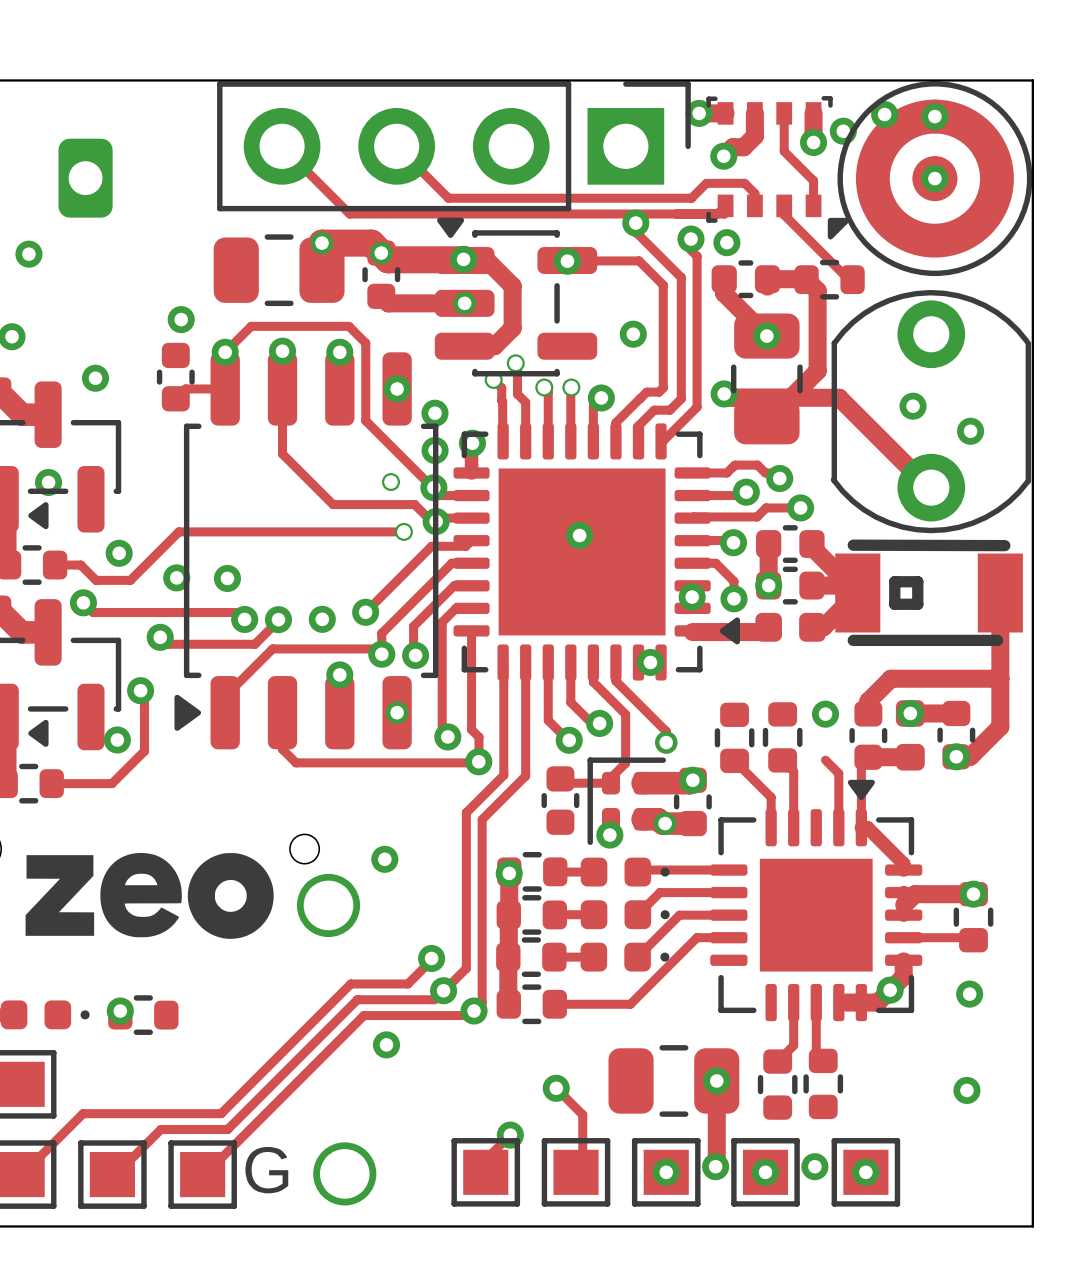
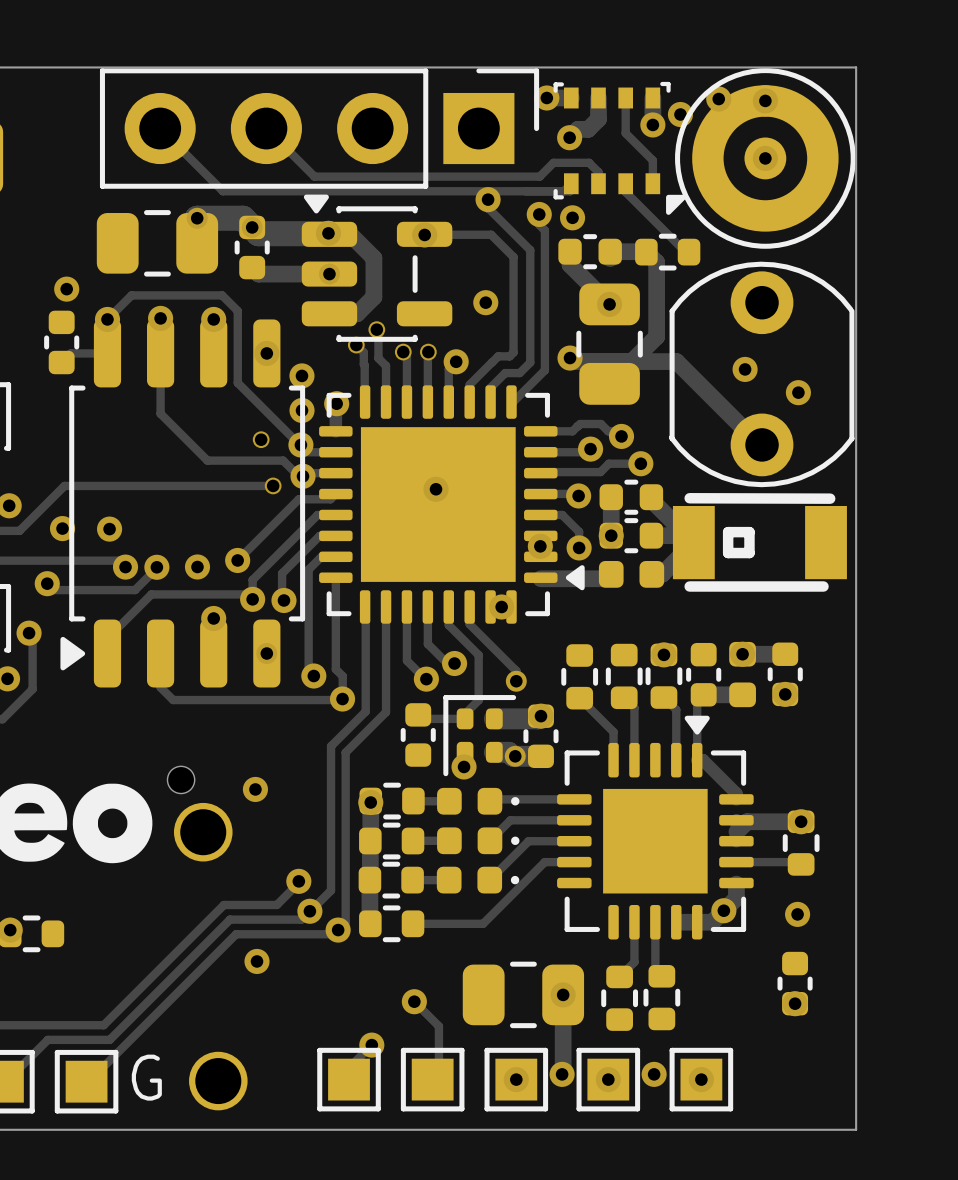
track: (1000, 593) (1000, 726) (970, 756) (956, 756) -> none
track: (1000, 678) (890, 678) (868, 701) (868, 713) -> none
part: none -> (663, 676)
part: none -> (795, 983)

